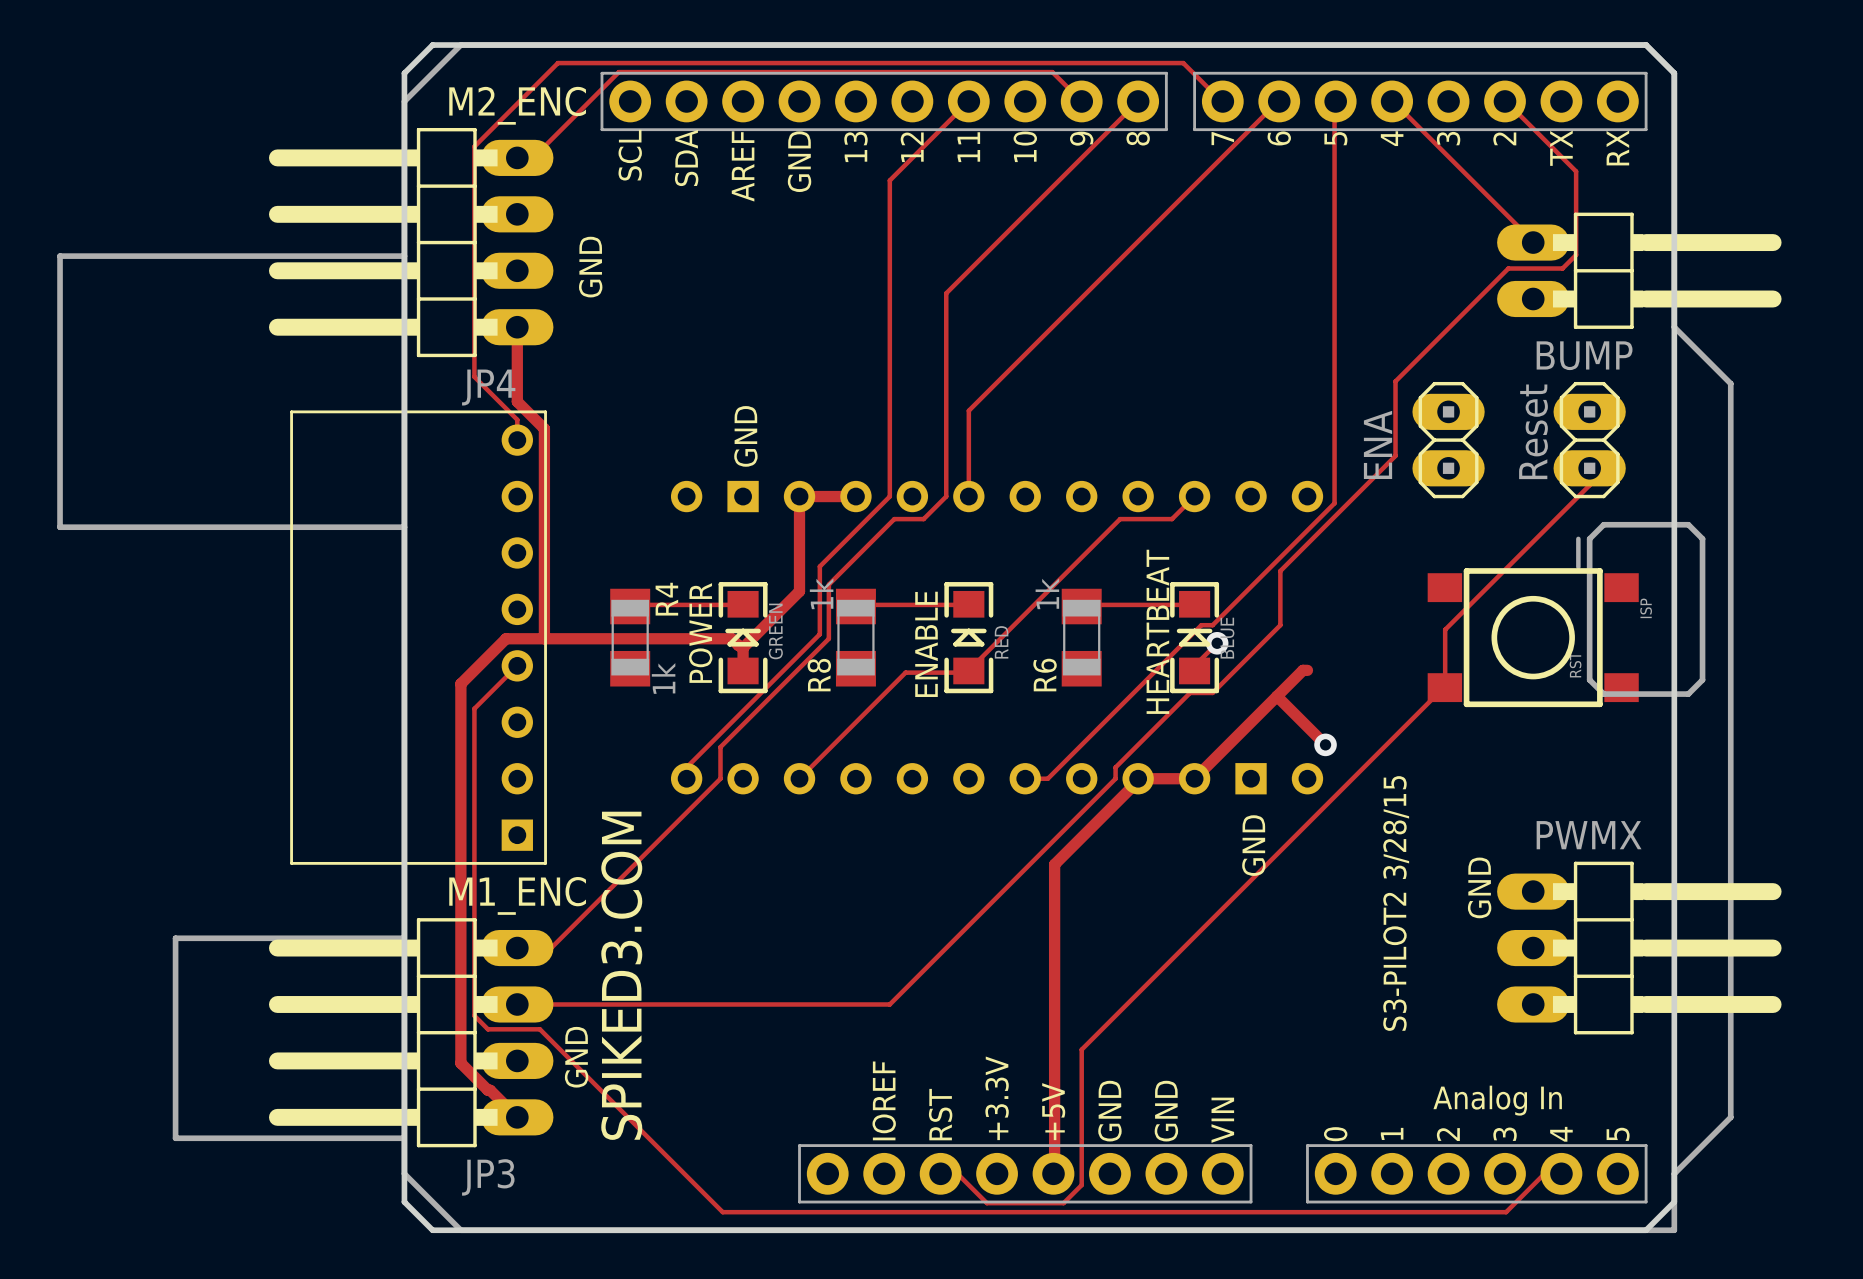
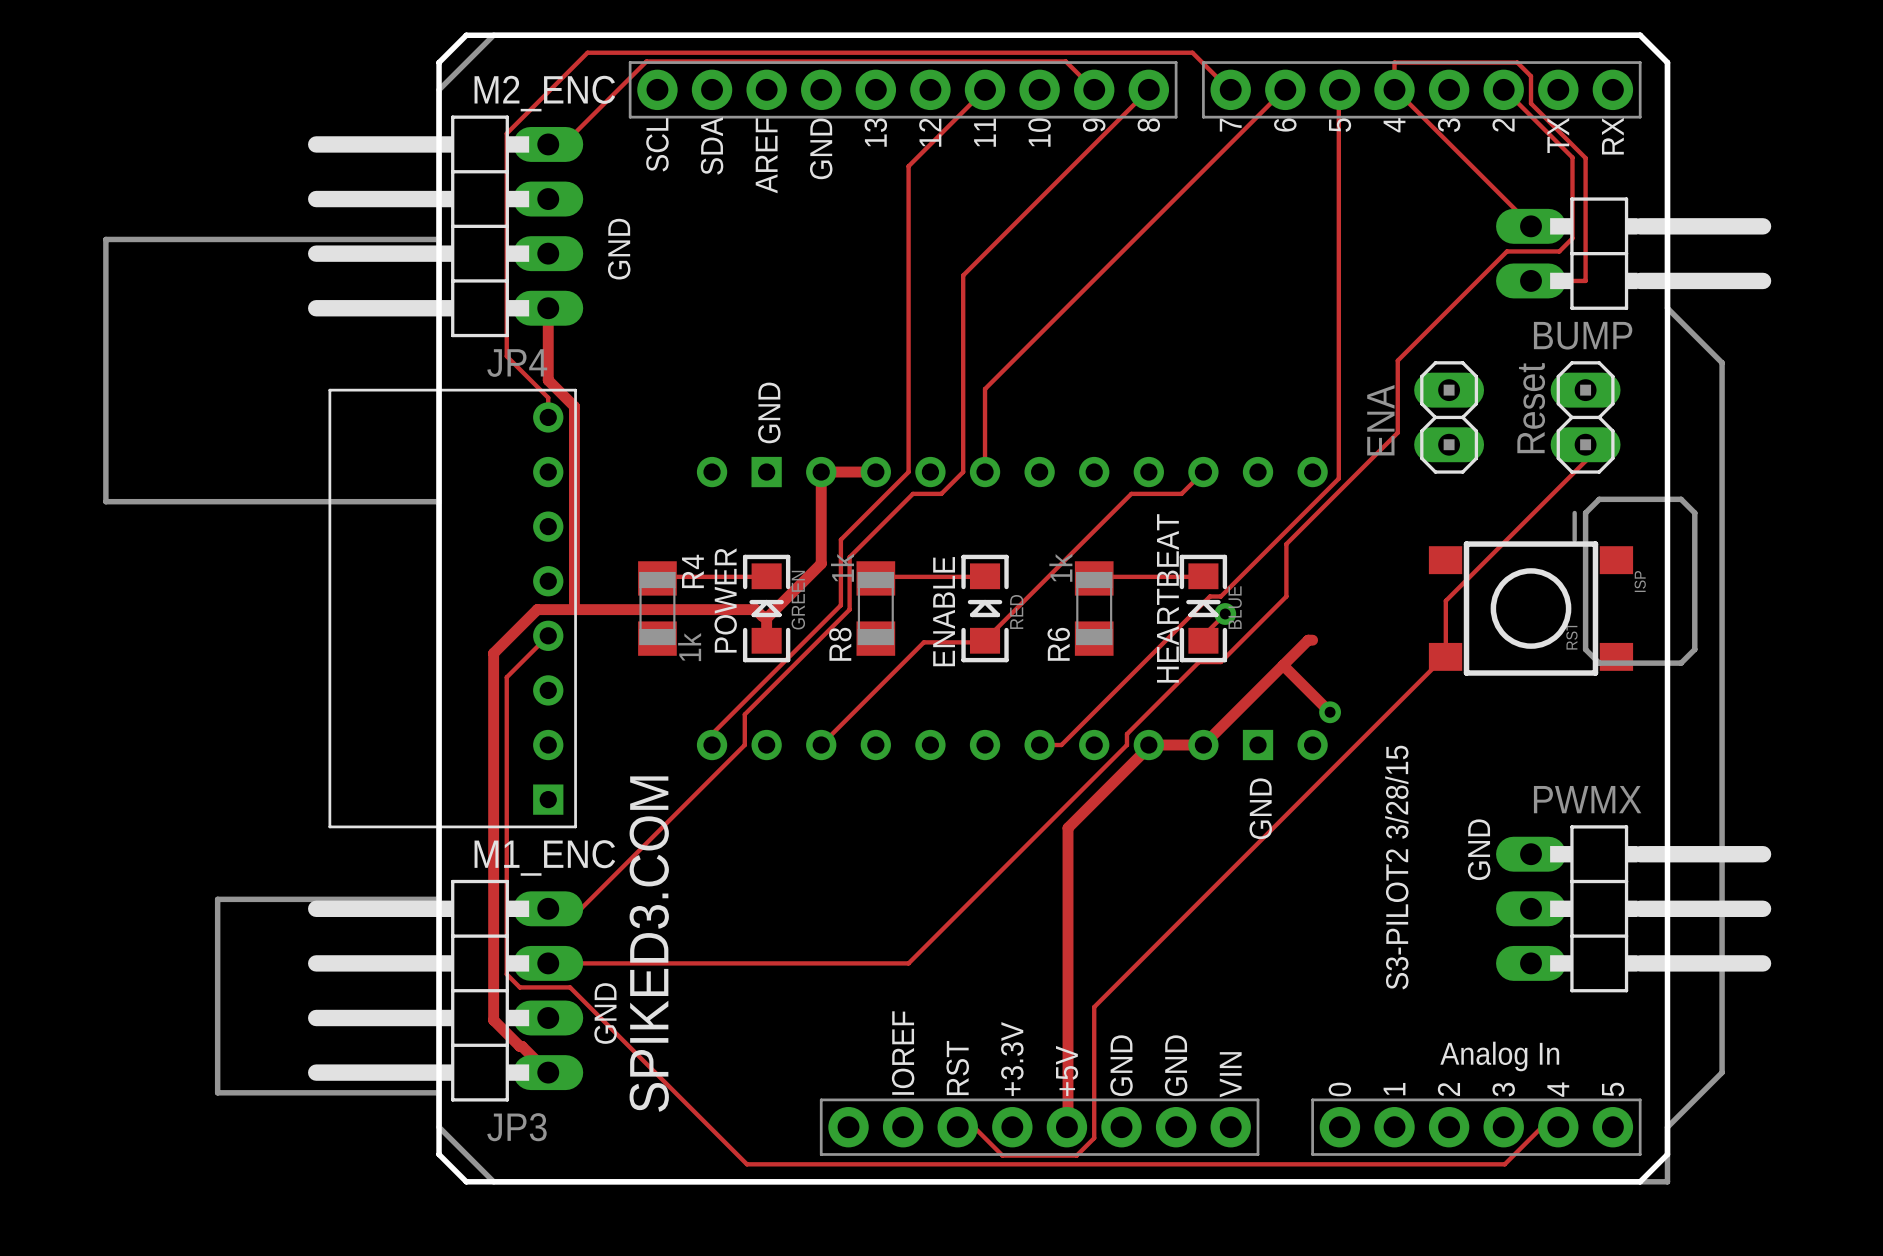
track: none -> (1394, 89) (1394, 62) (1517, 62) (1530, 76) (1530, 103) (1585, 158) (1585, 280) (1530, 280)

